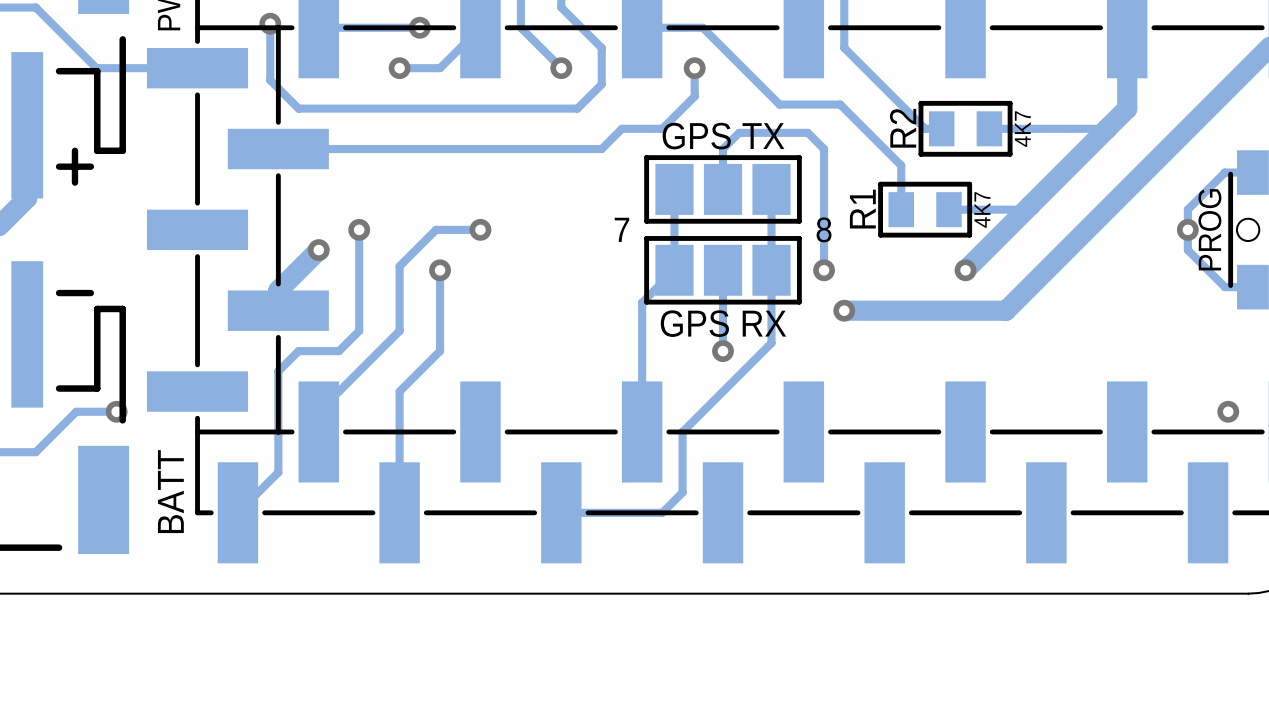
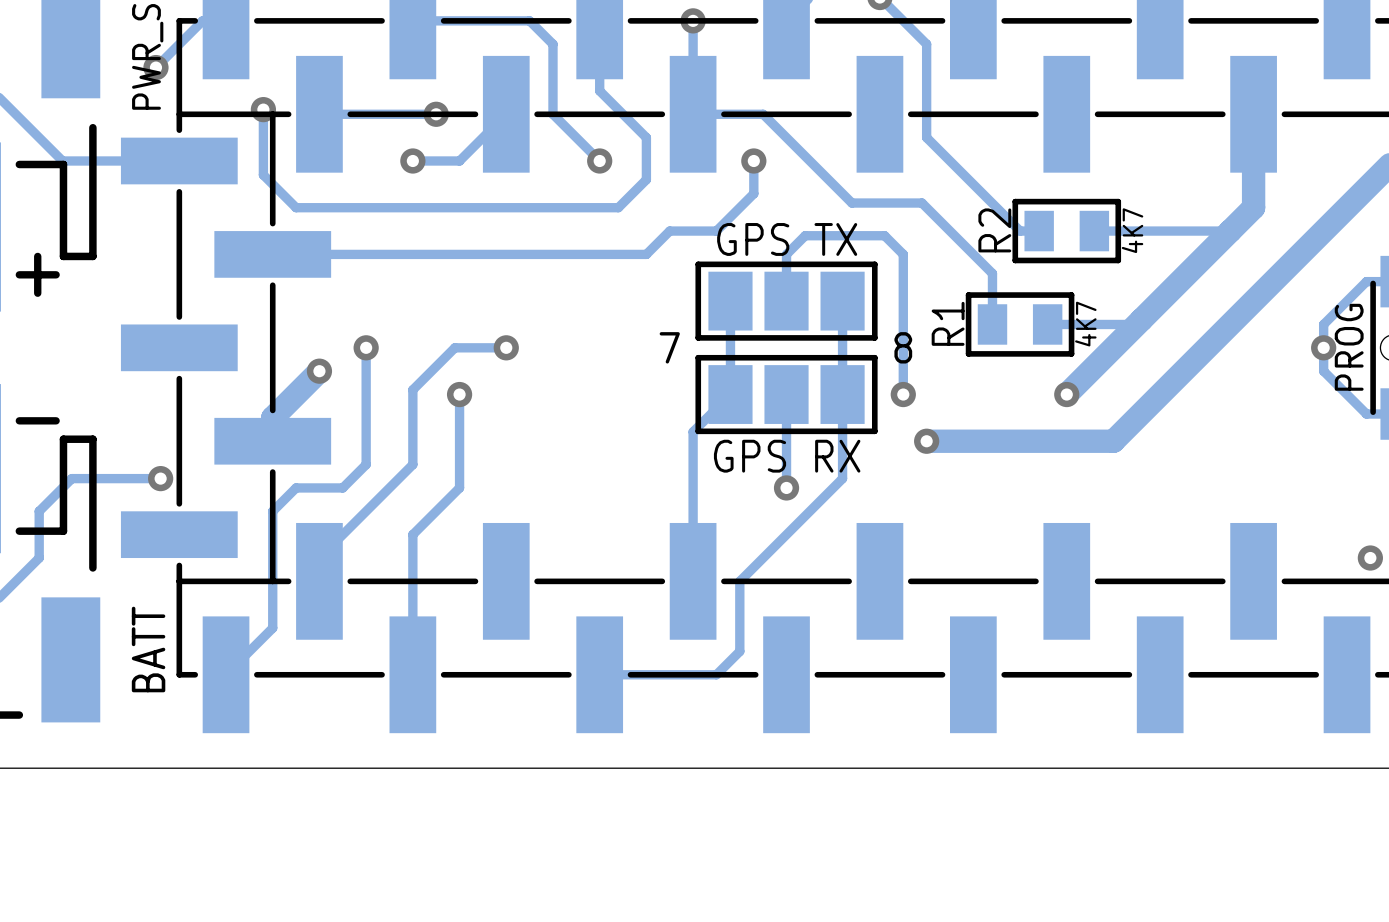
track: (116, 411) (76, 411) -> (160, 478) (71, 478) (39, 511) (39, 558)
via position: (116, 411) -> (160, 478)

